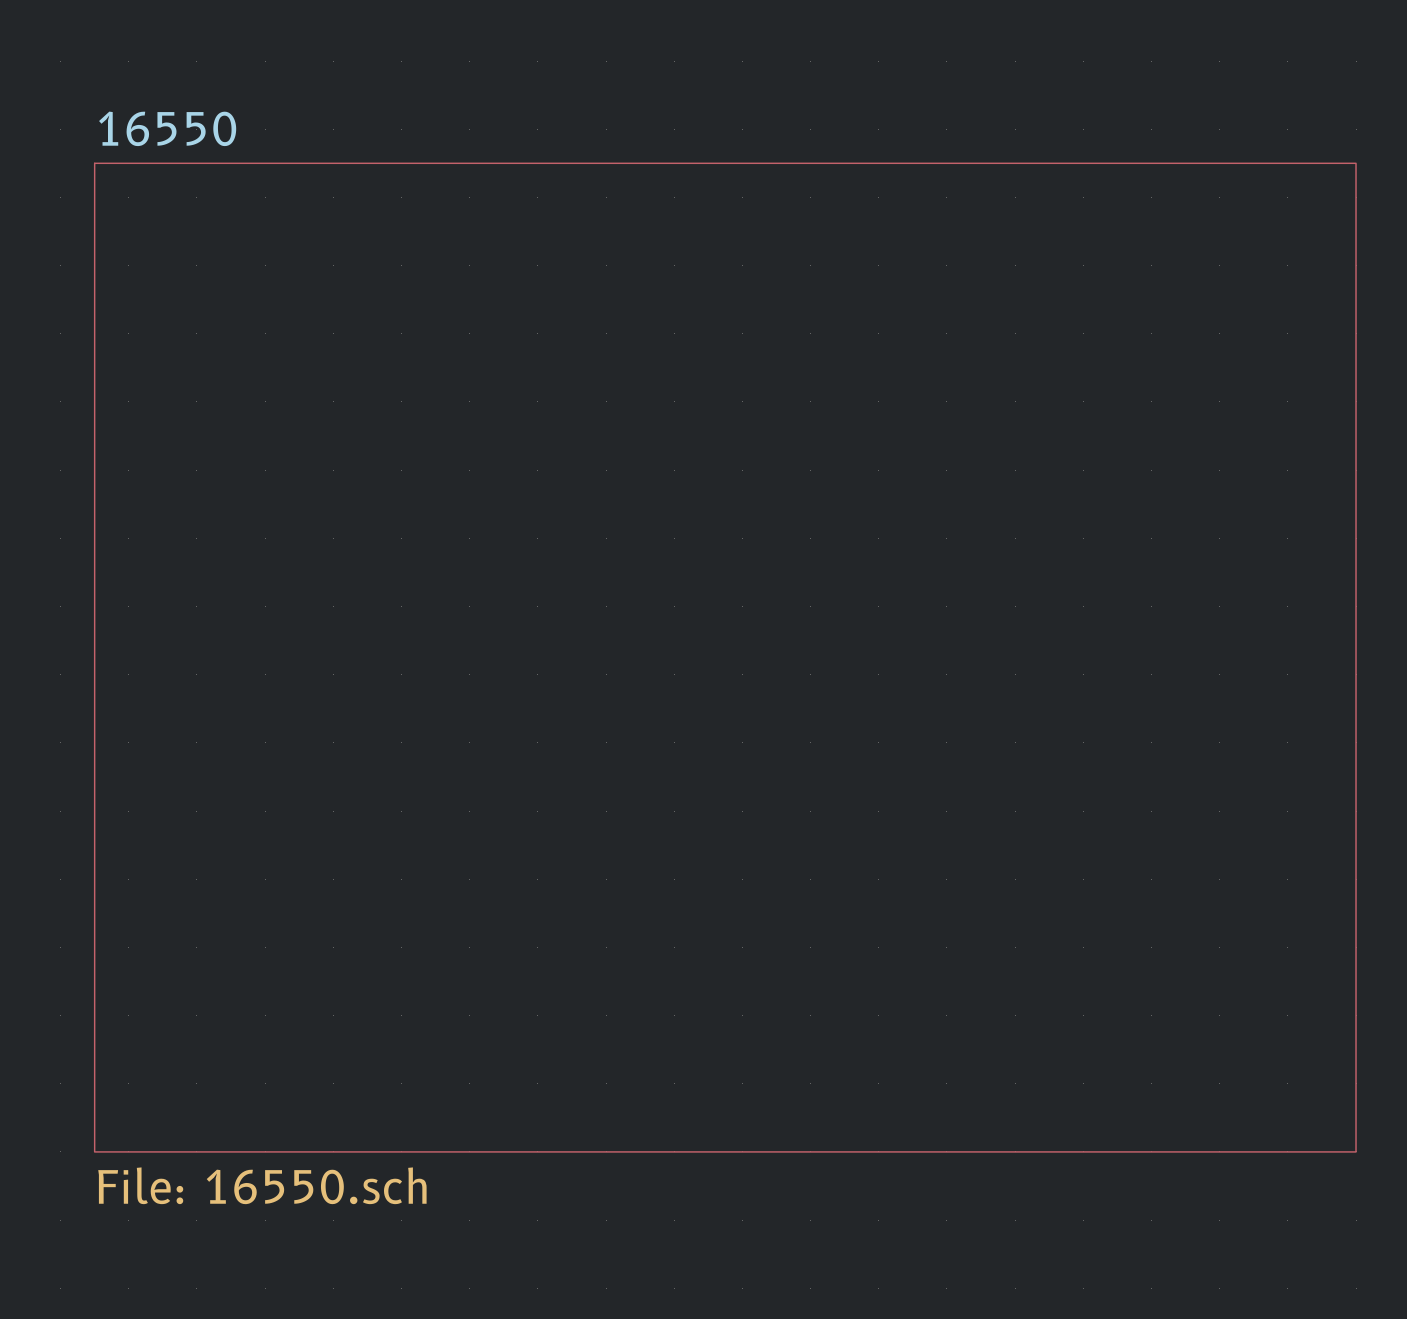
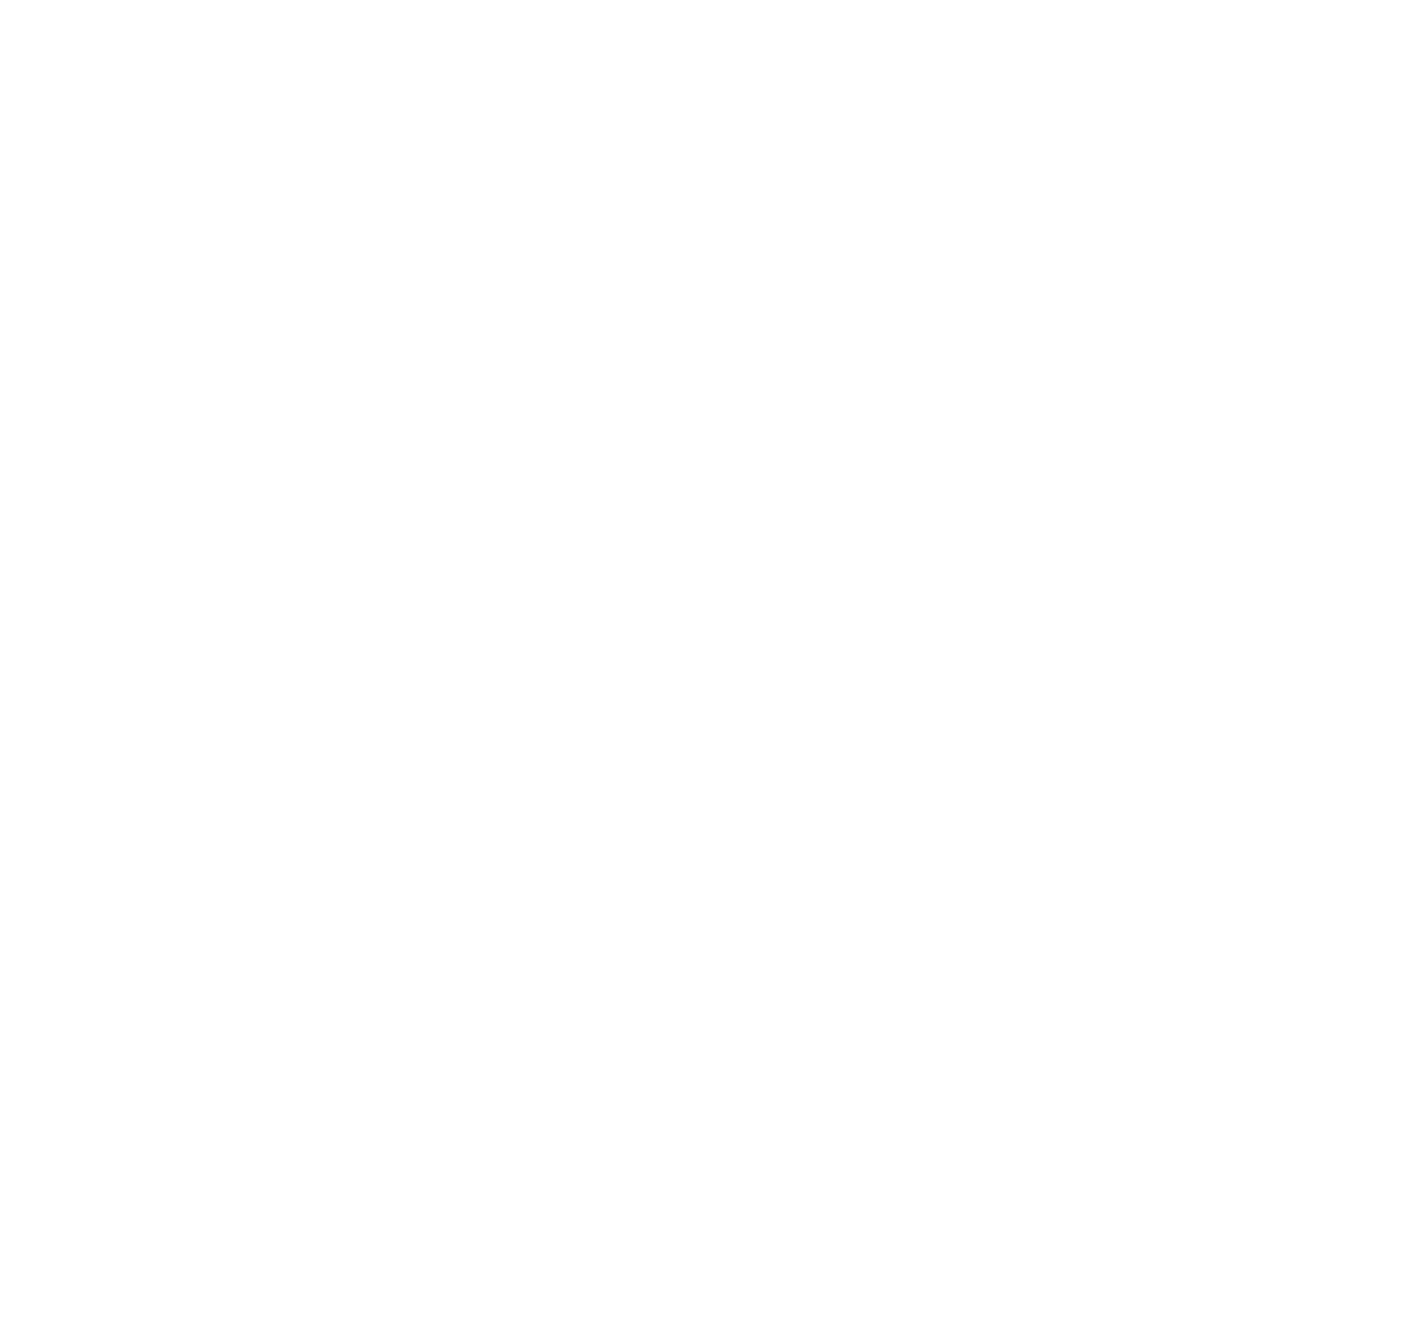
sheet 16550: File: 16550.sch (725, 657) -> none

